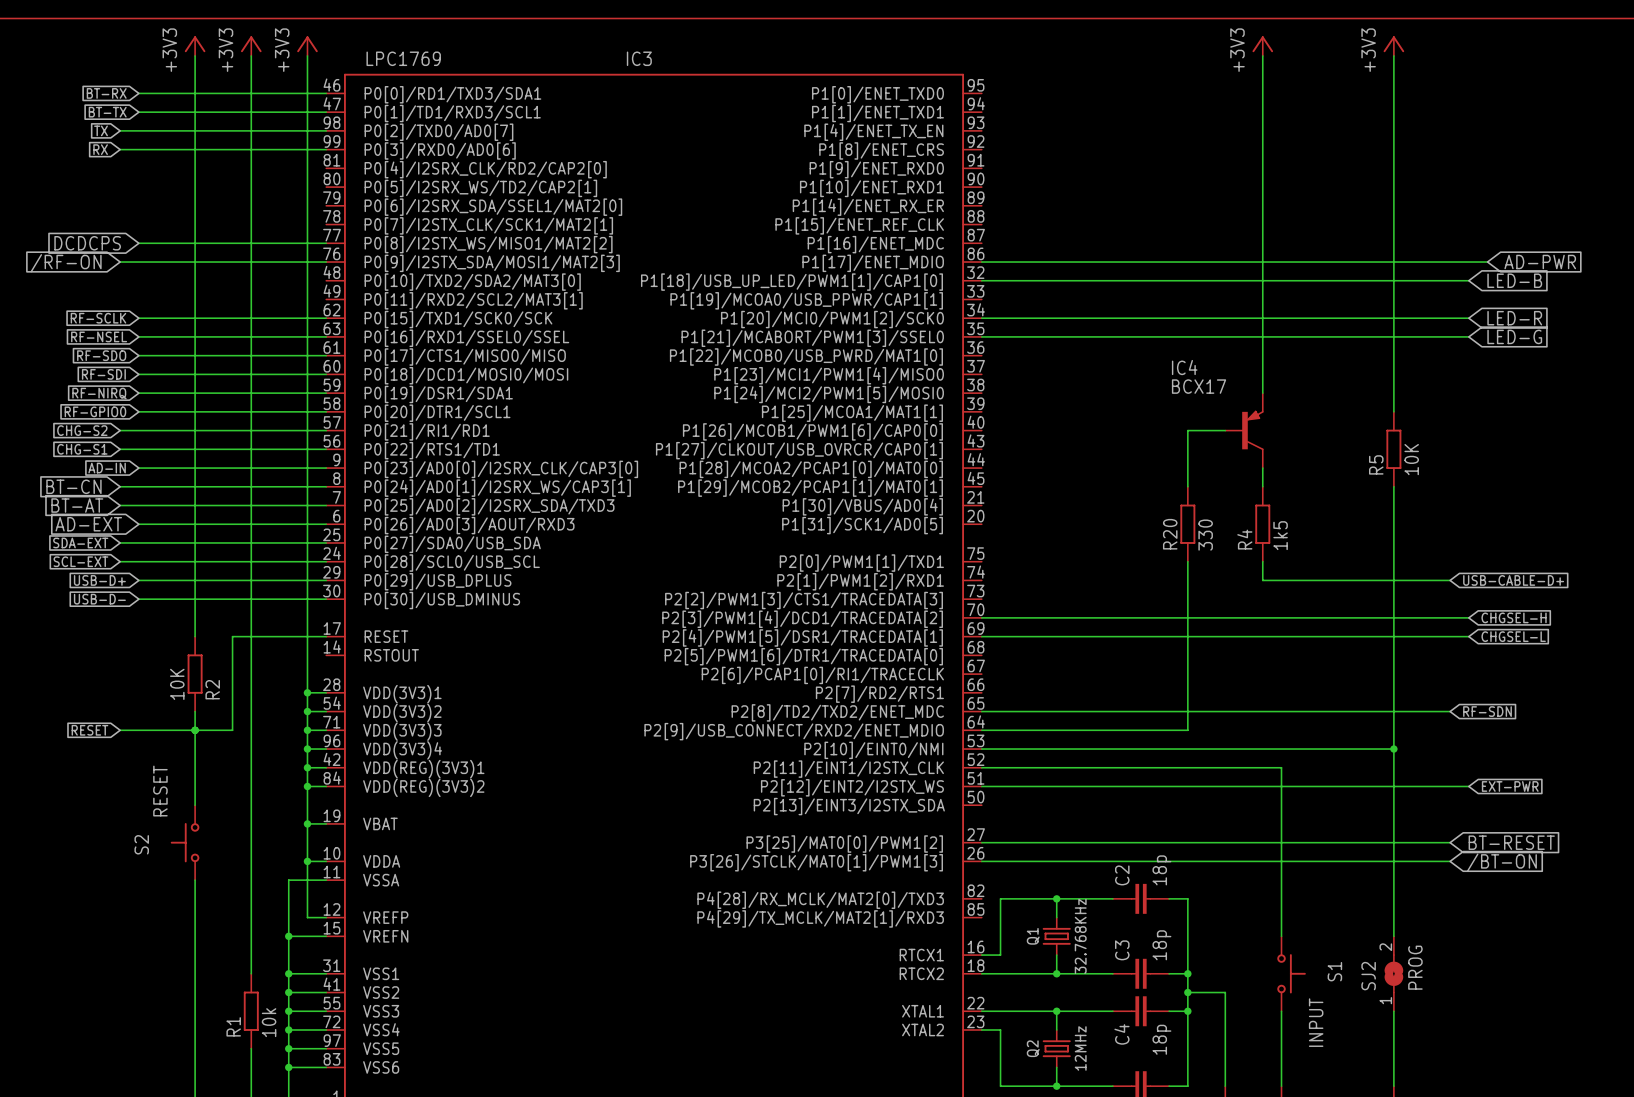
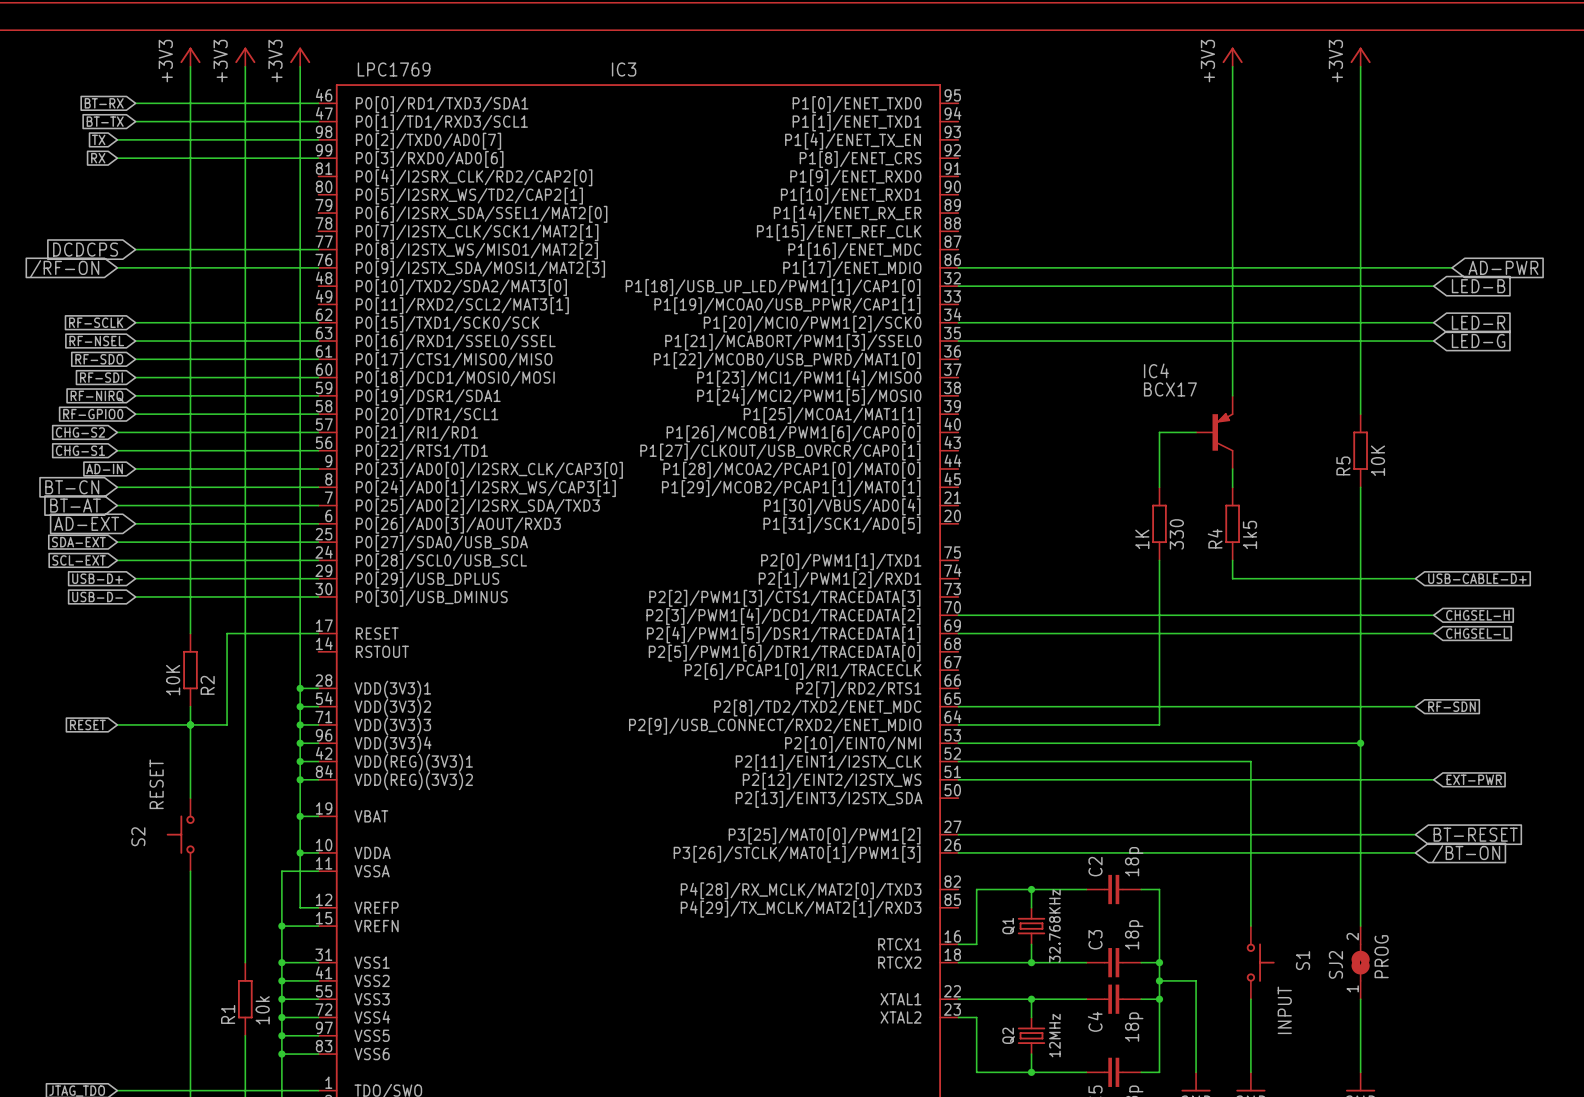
R20 name: R20 (1170, 534) -> 1K (1142, 539)

